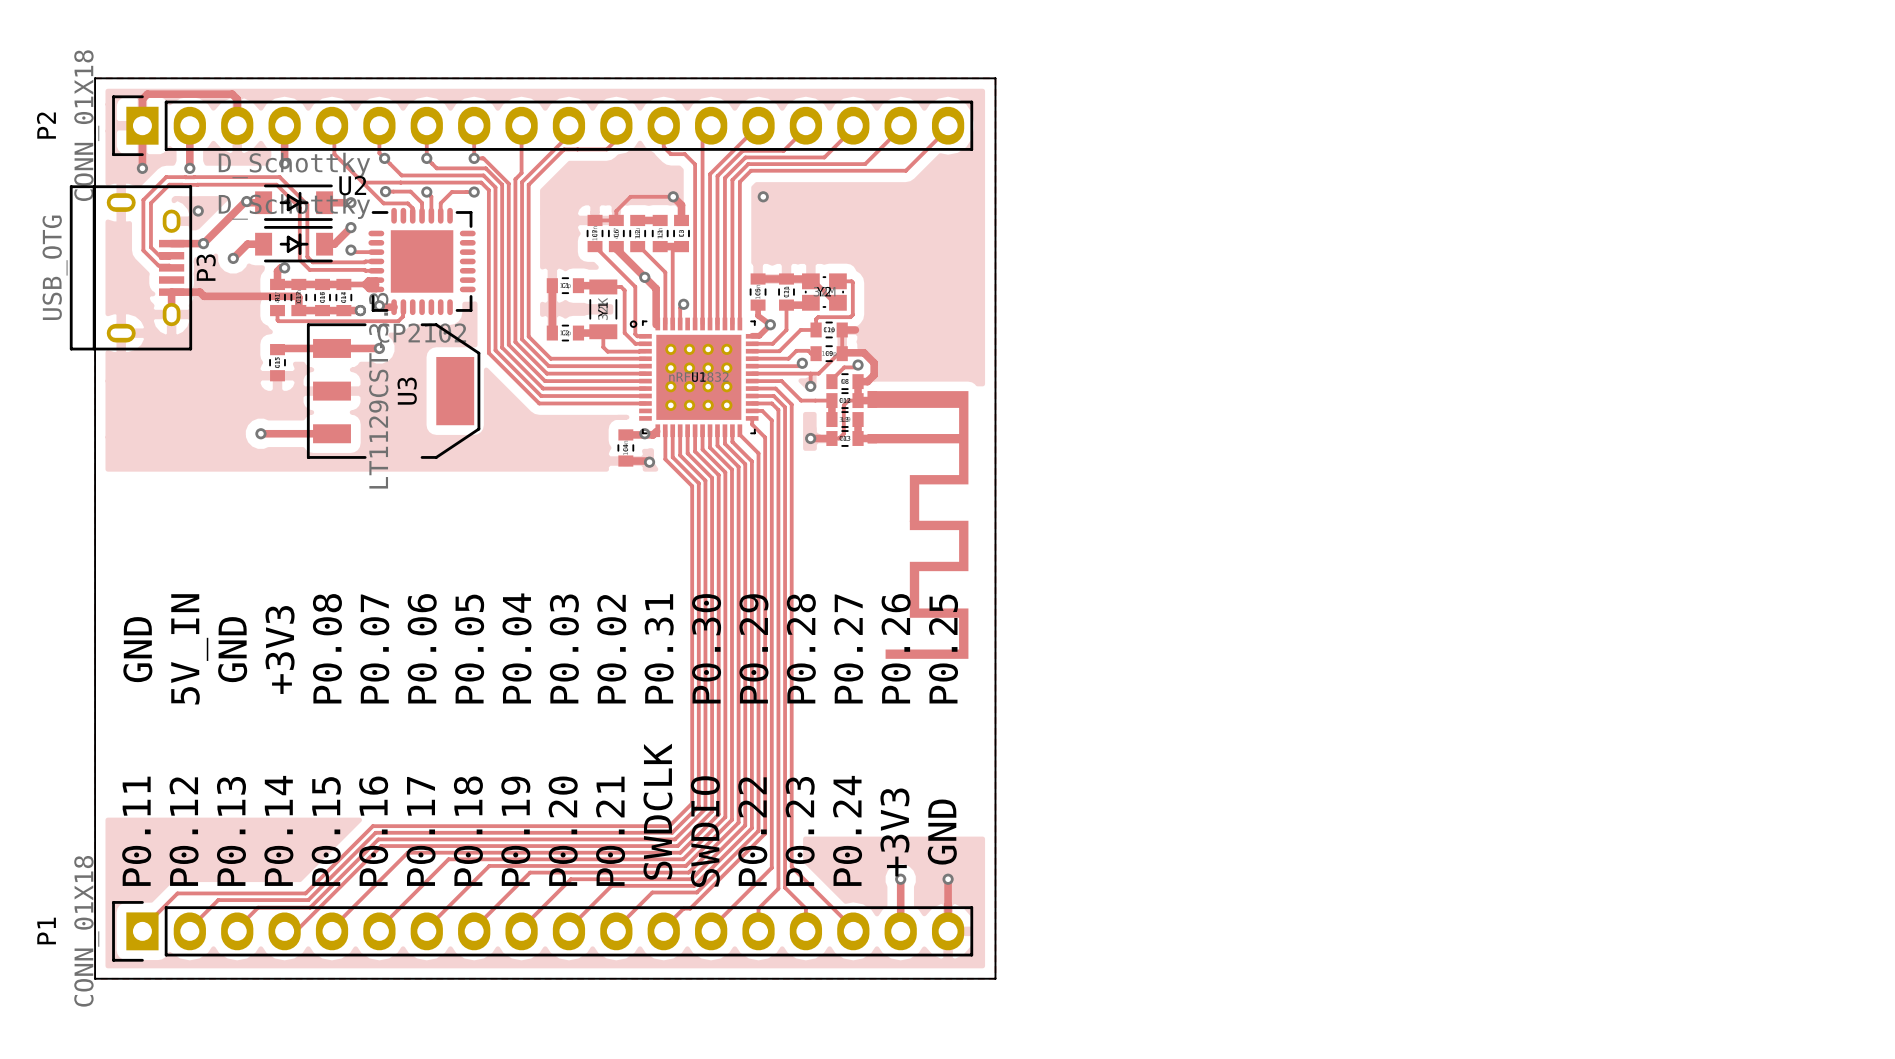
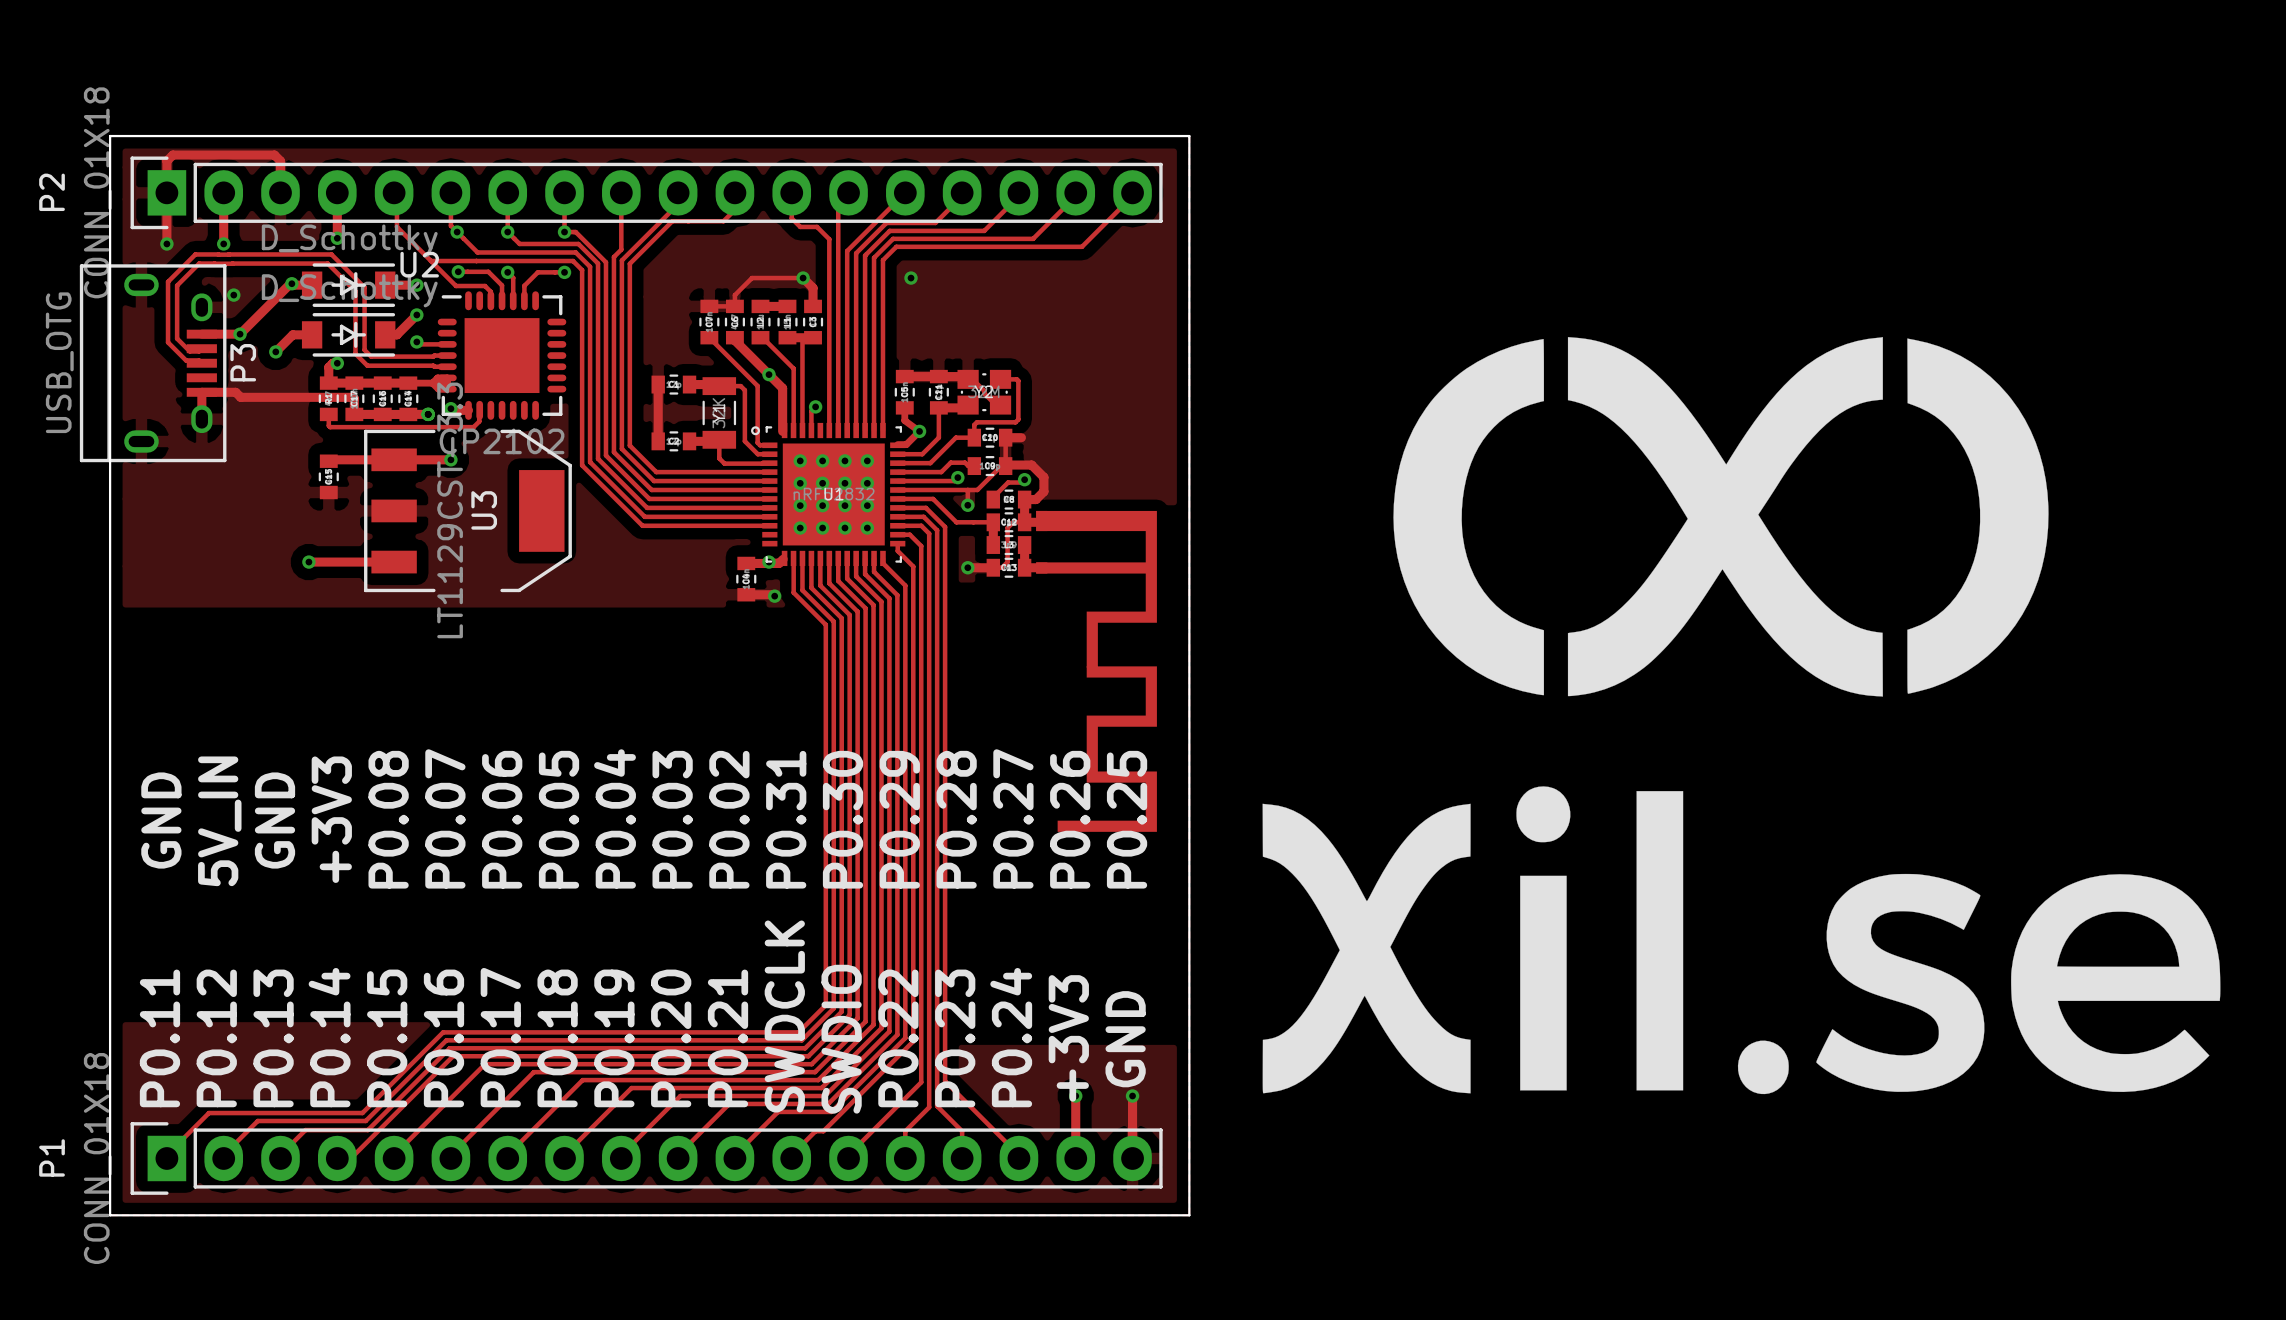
drawing: none -> [1262, 337, 2221, 1095]

